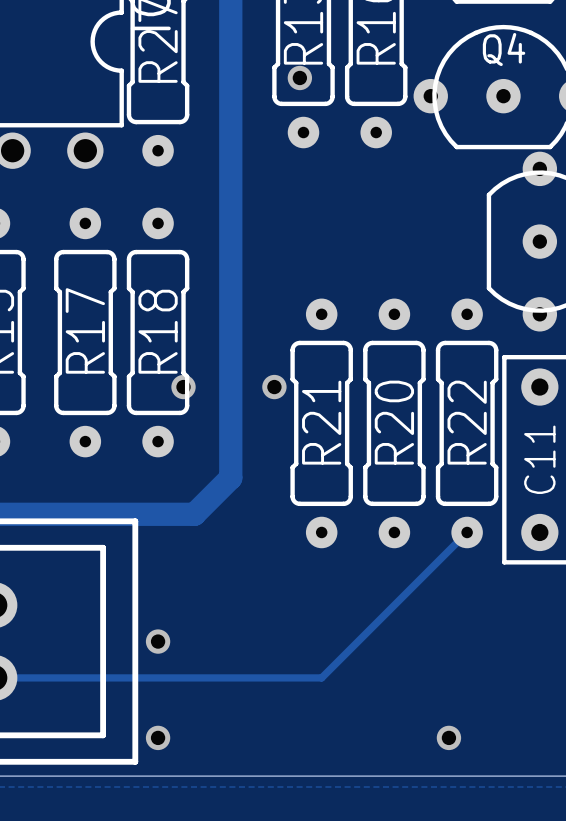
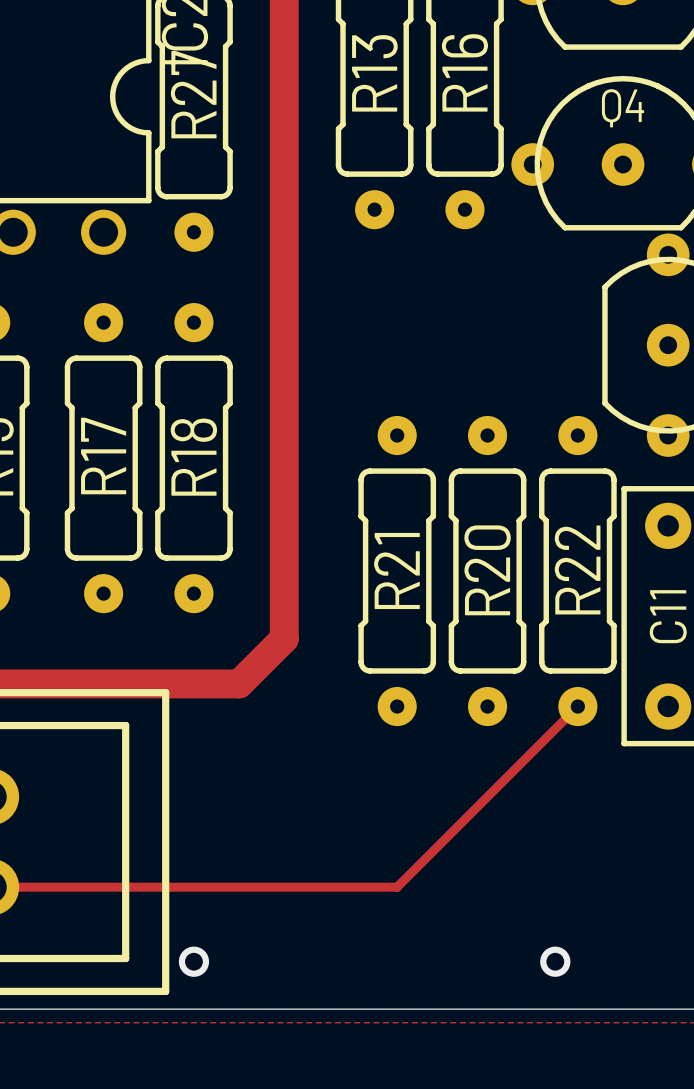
via: (299, 77) -> none
via: (183, 387) -> none
via: (274, 387) -> none
via: (158, 641) -> none

